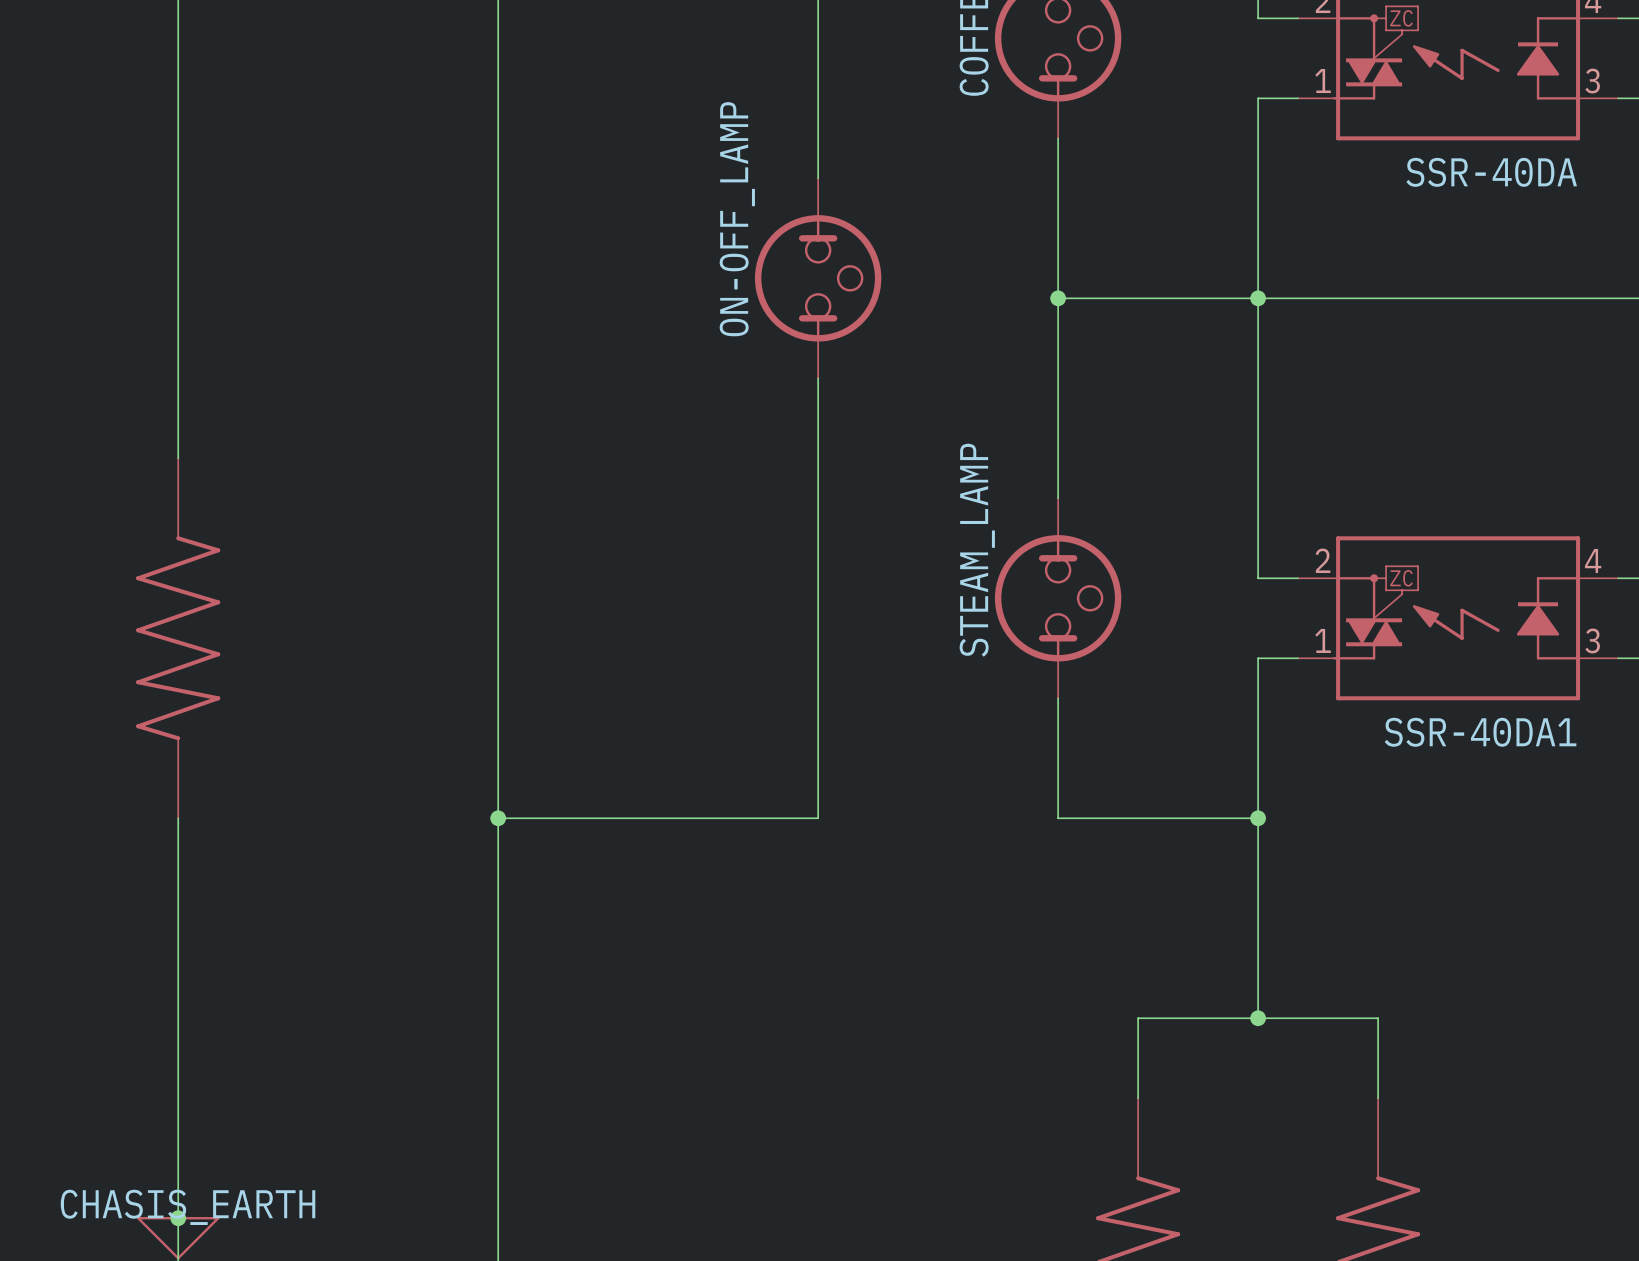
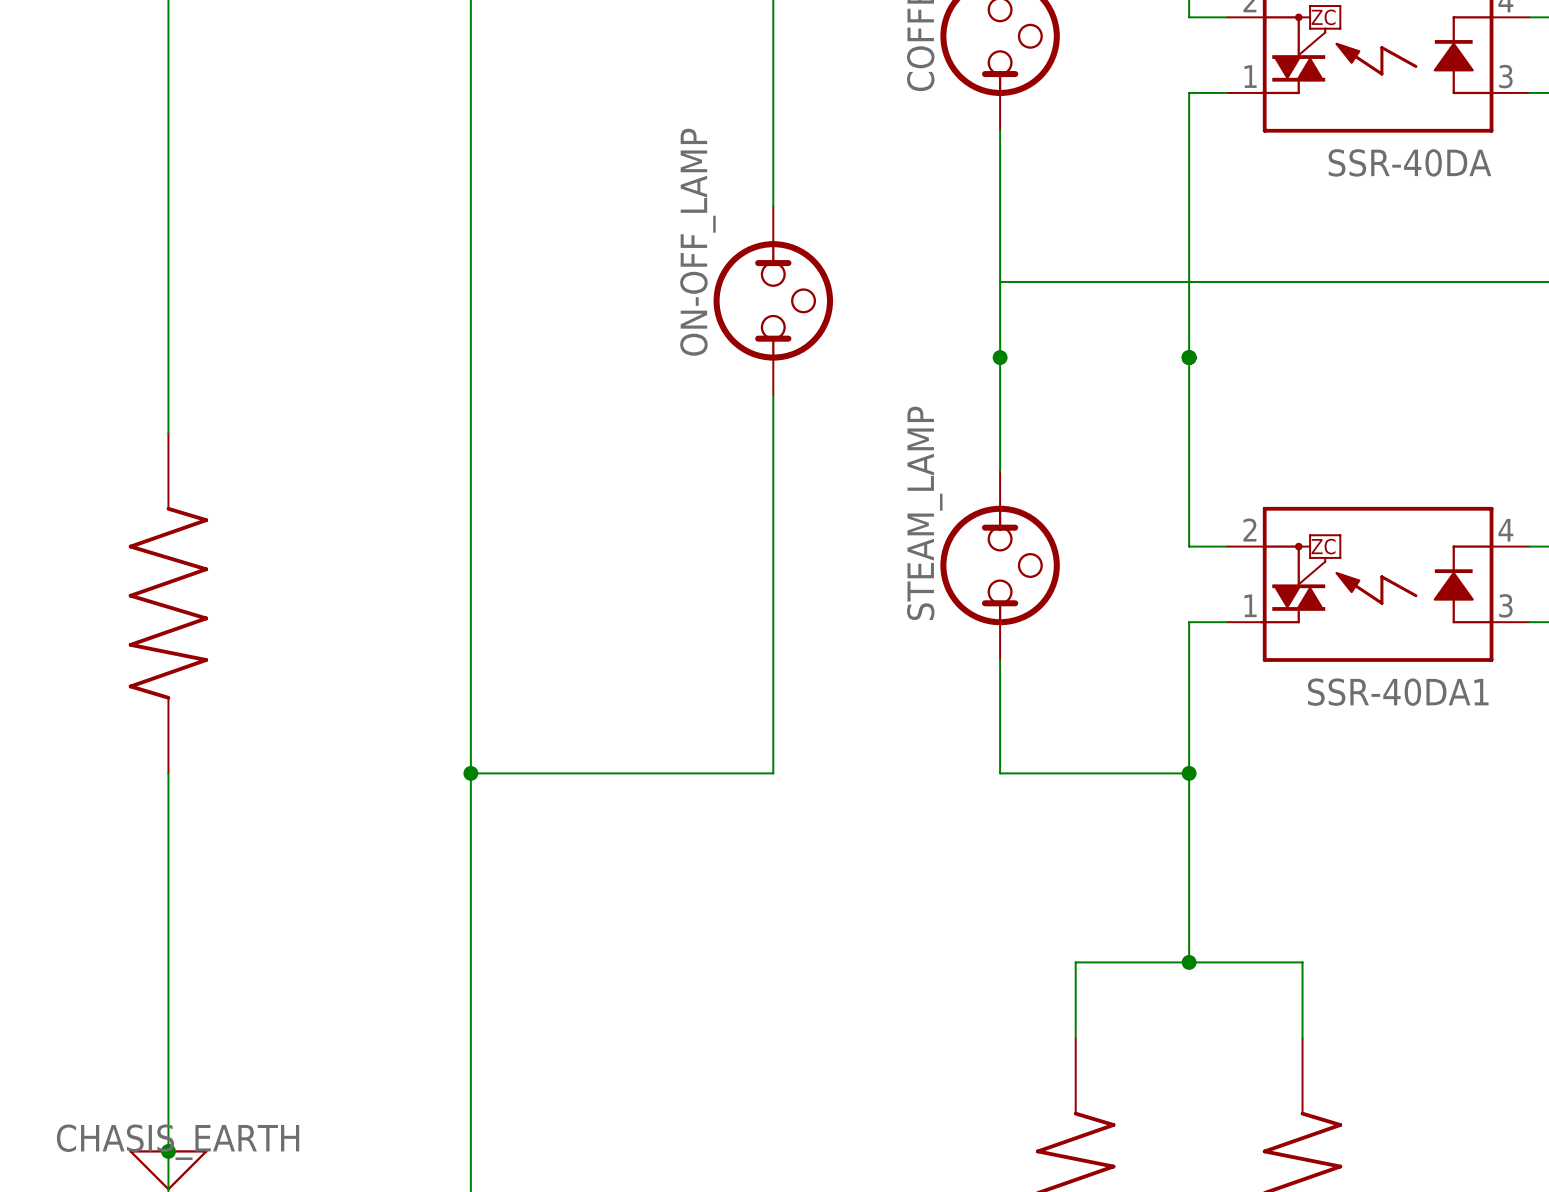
ON-OFF_LAMP position: (818, 278) -> (773, 300)
junction position: (1058, 298) -> (1000, 357)
junction position: (1258, 298) -> (1189, 357)

